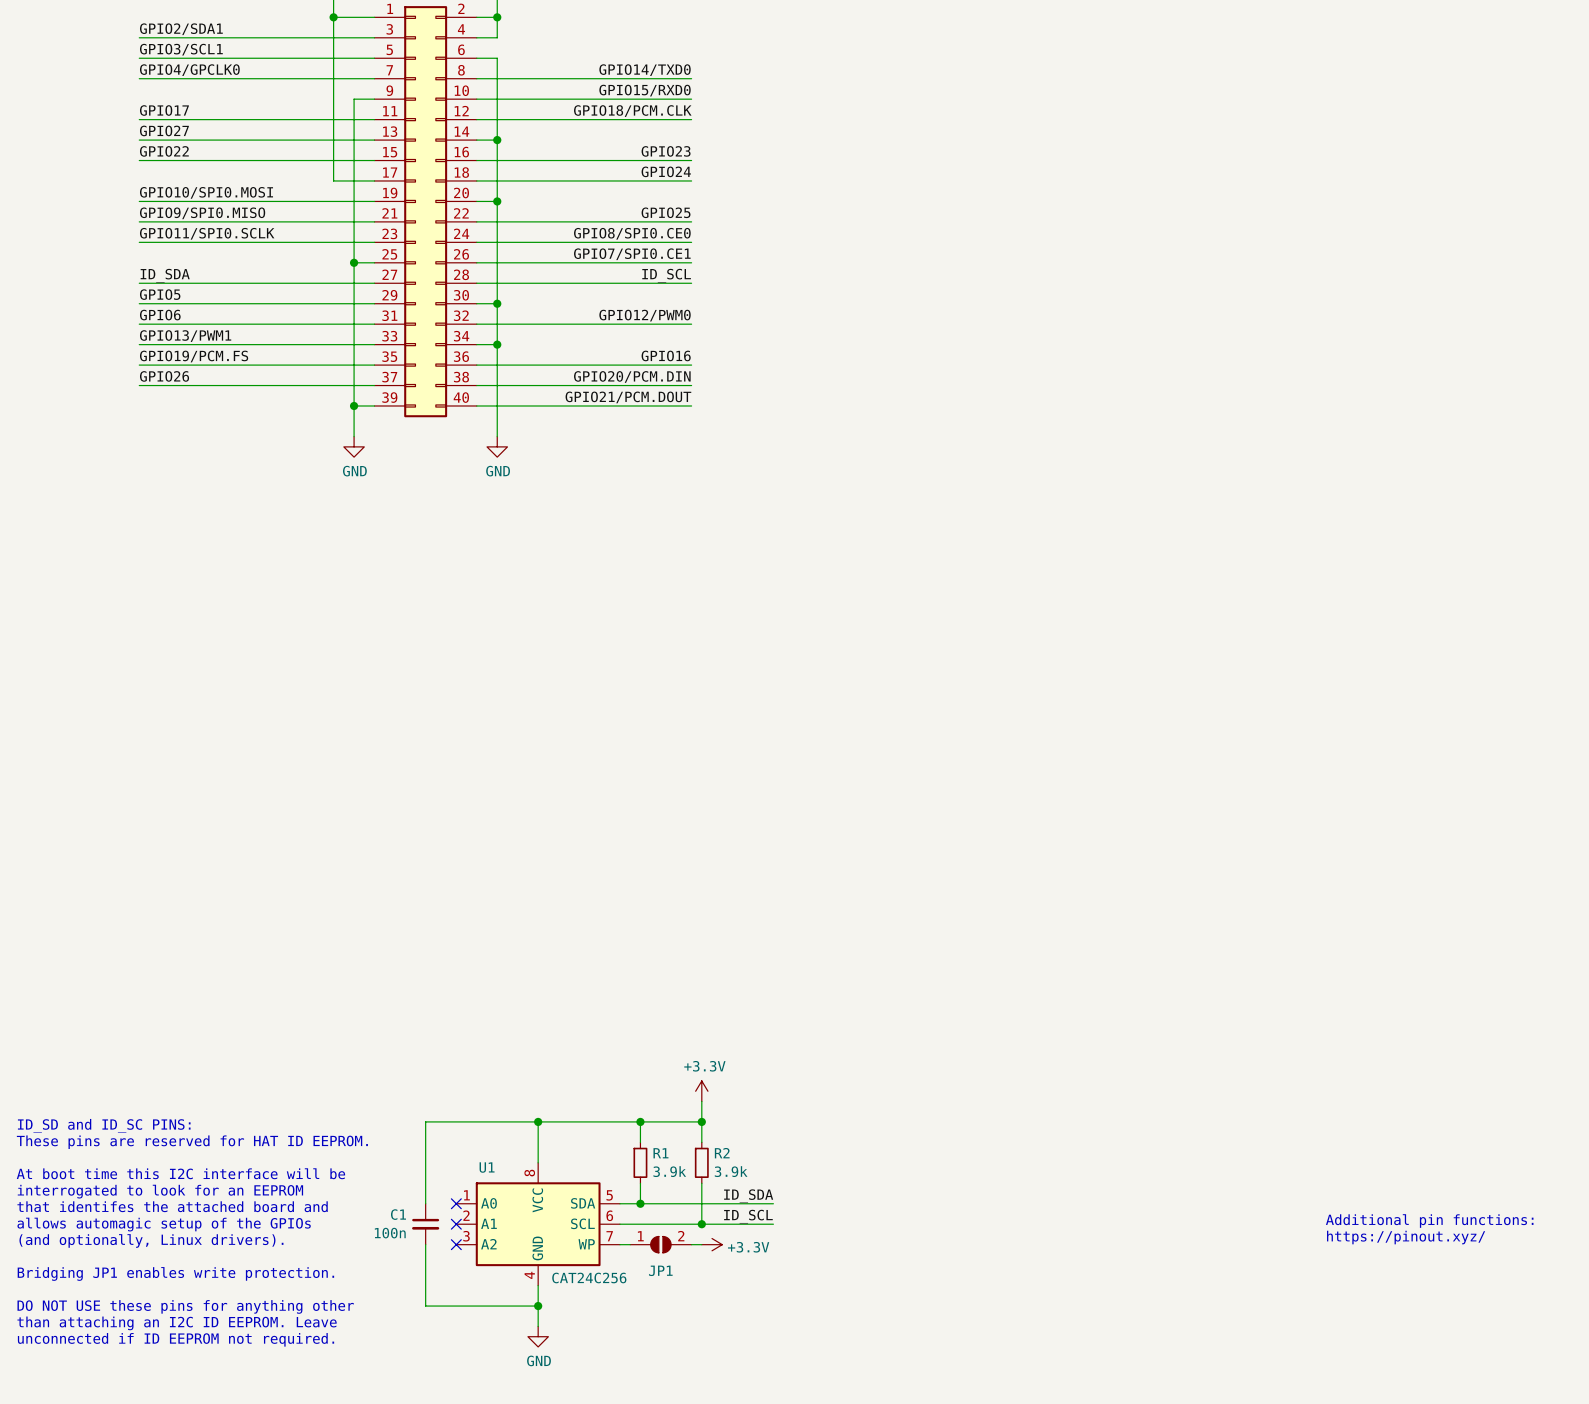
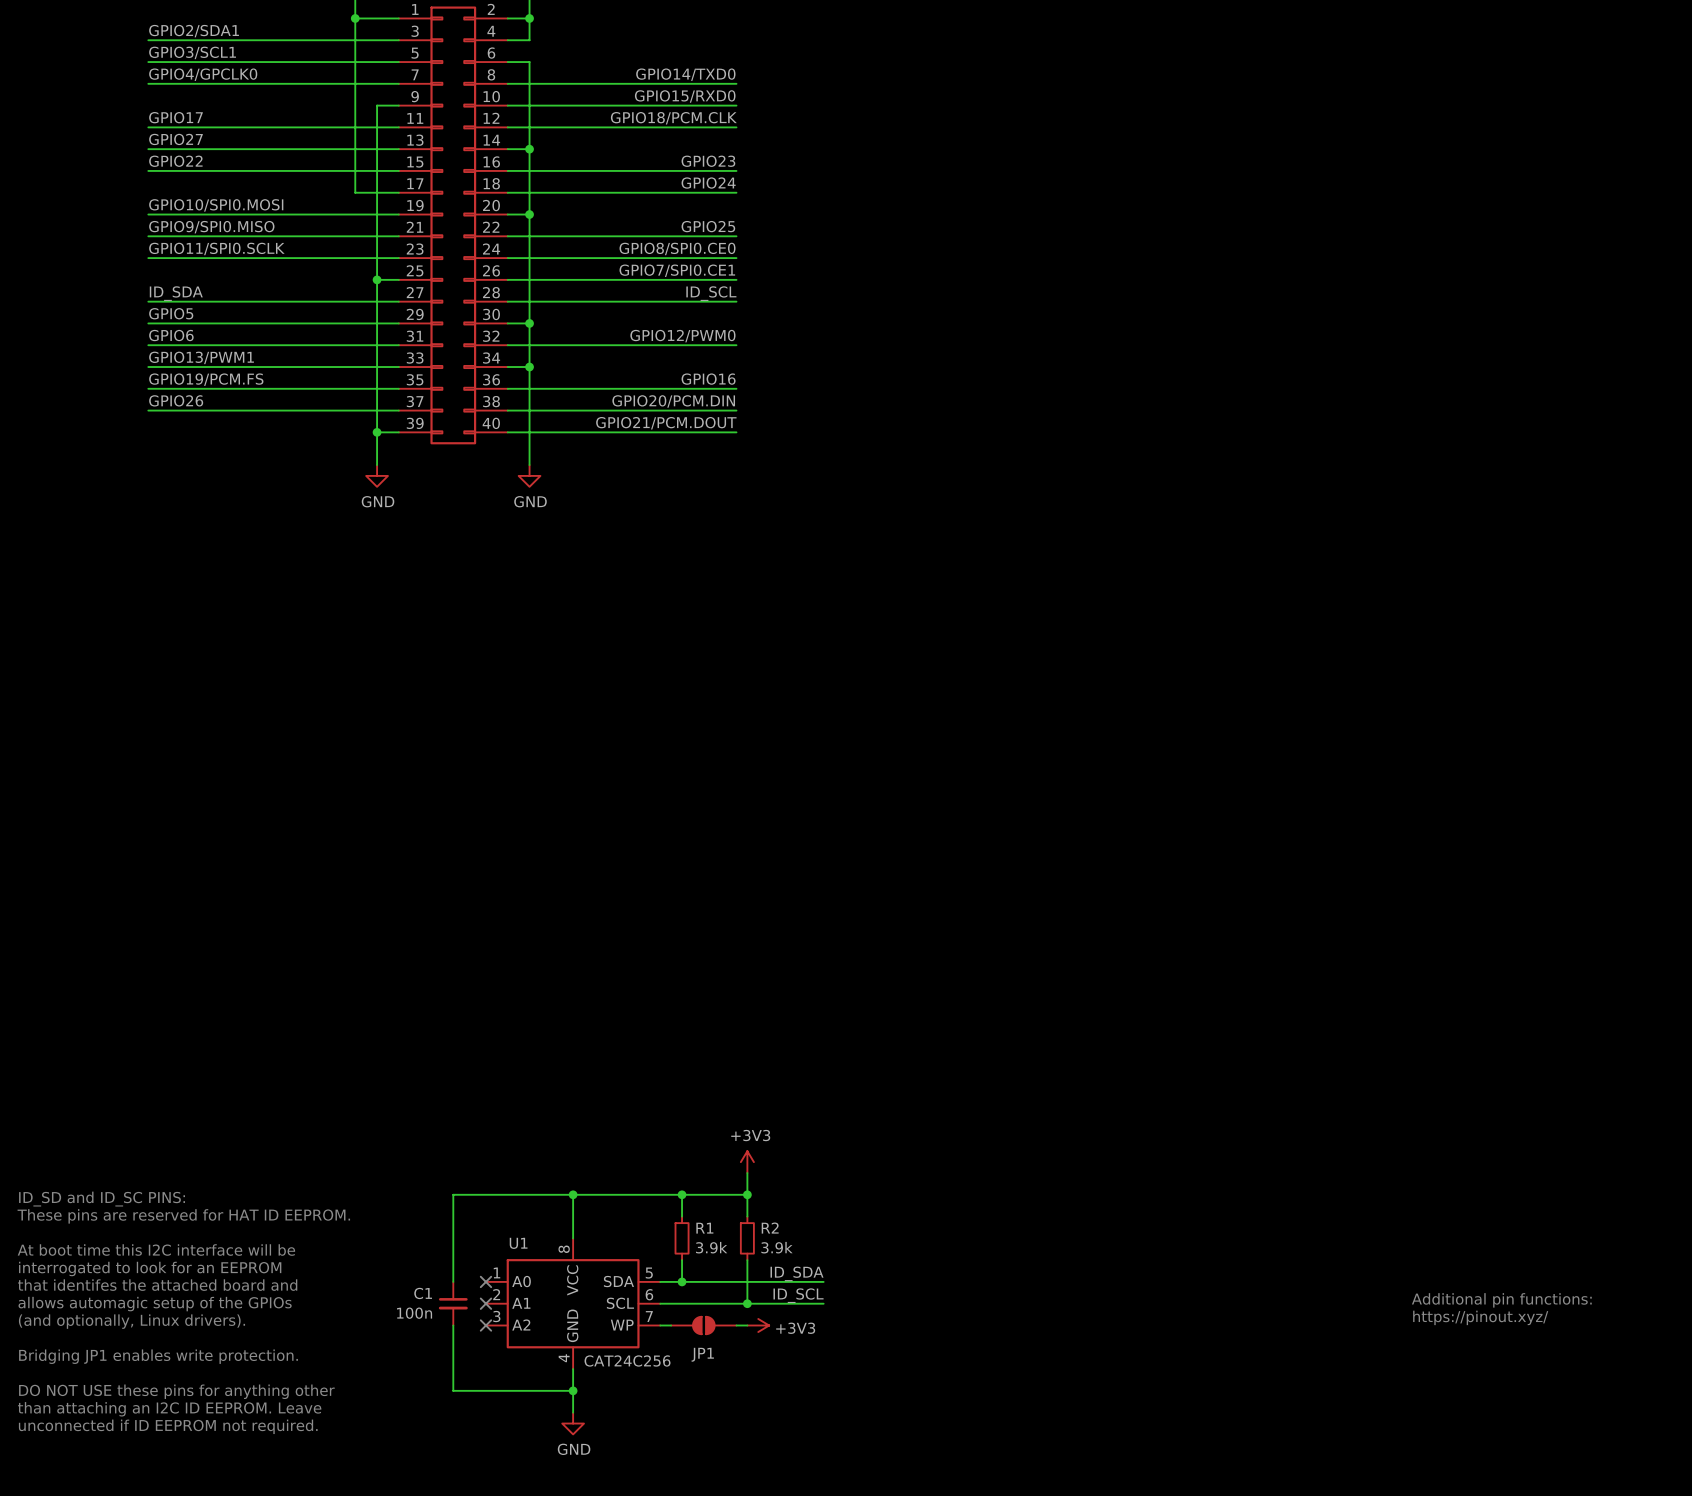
power symbol: +3.3V (701, 1091) -> +3V3 (747, 1162)
JP1 pin number: 1 (640, 1236) -> none
JP1 pin number: 2 (681, 1236) -> none
power symbol: +3.3V (712, 1244) -> +3V3 (758, 1325)

